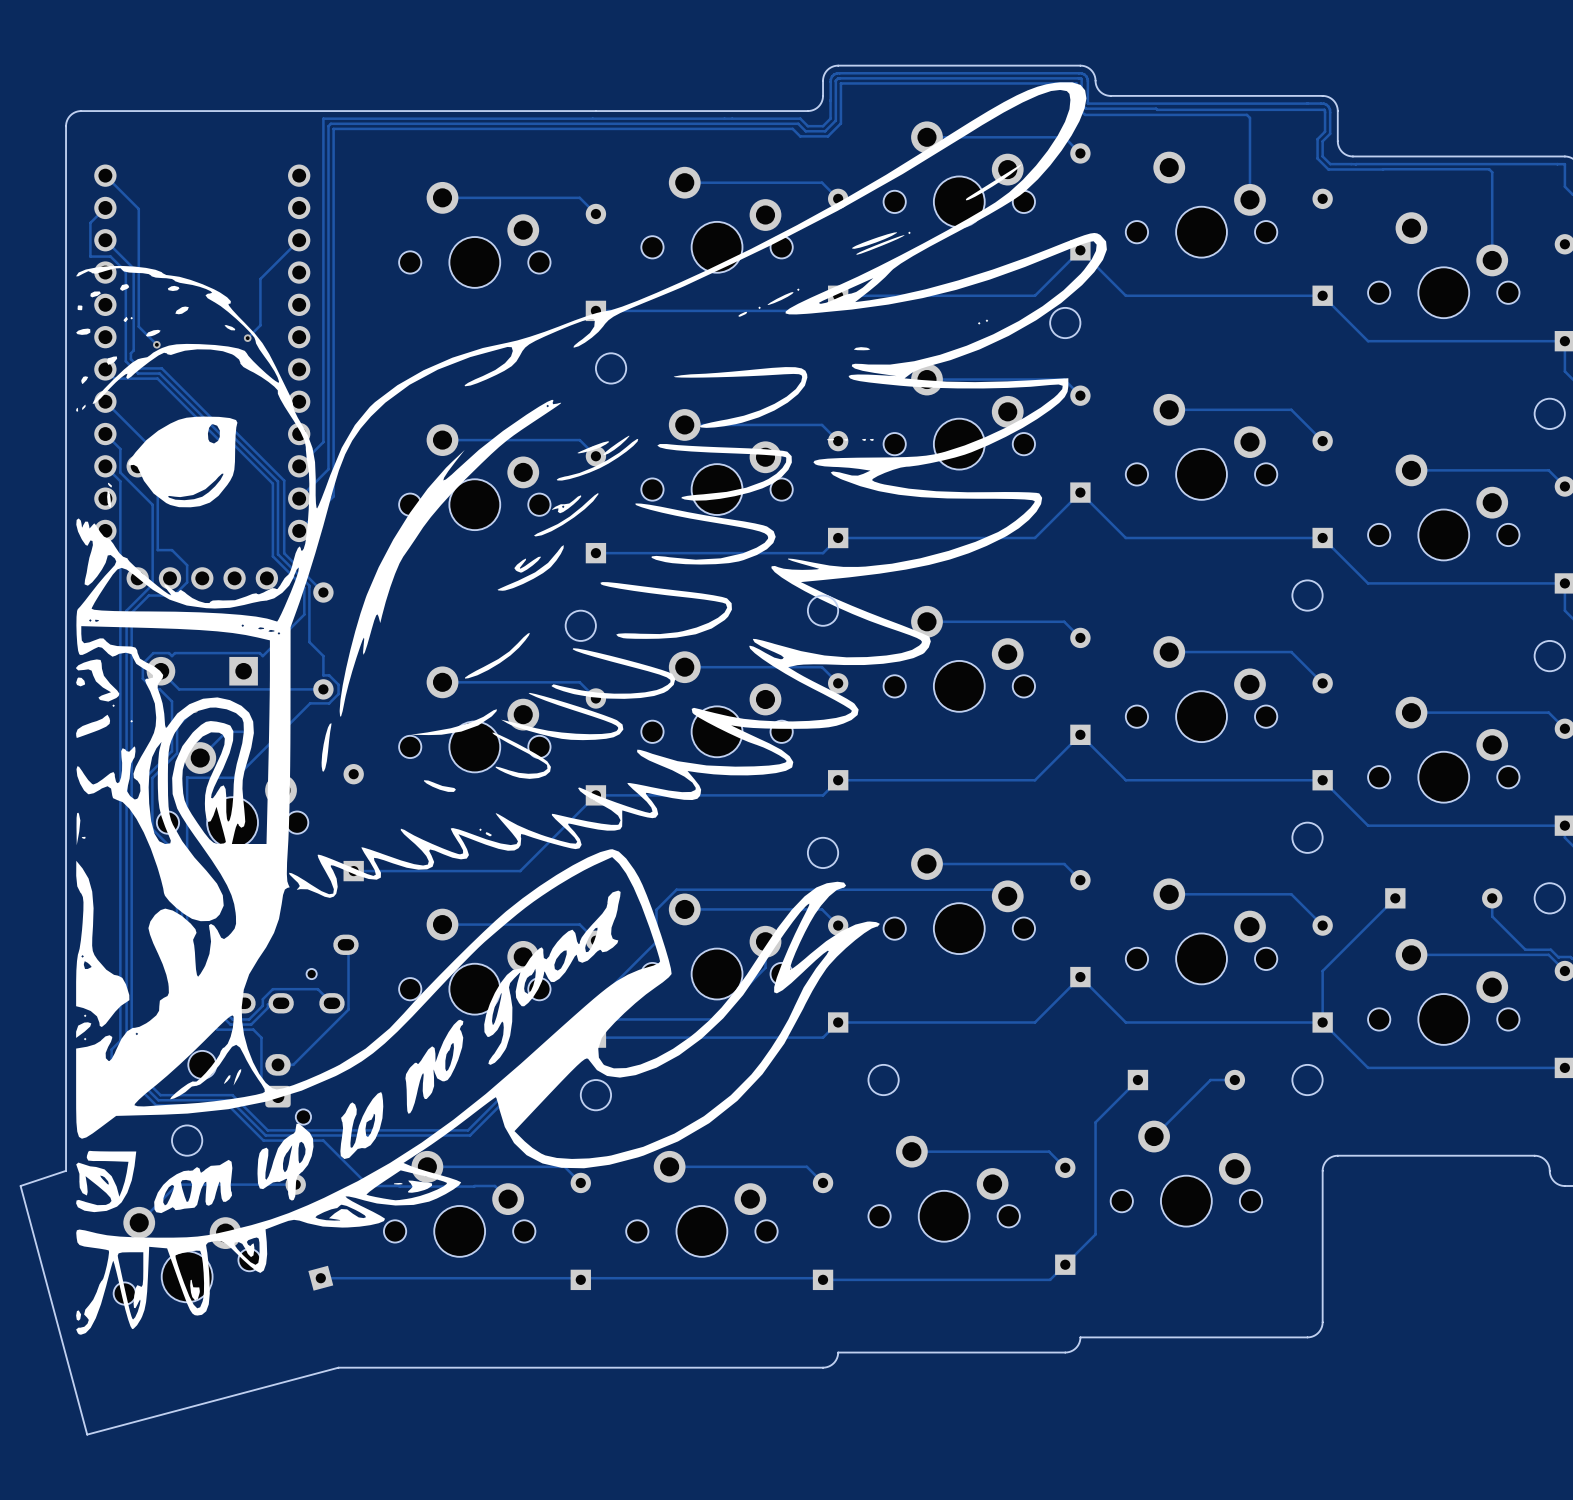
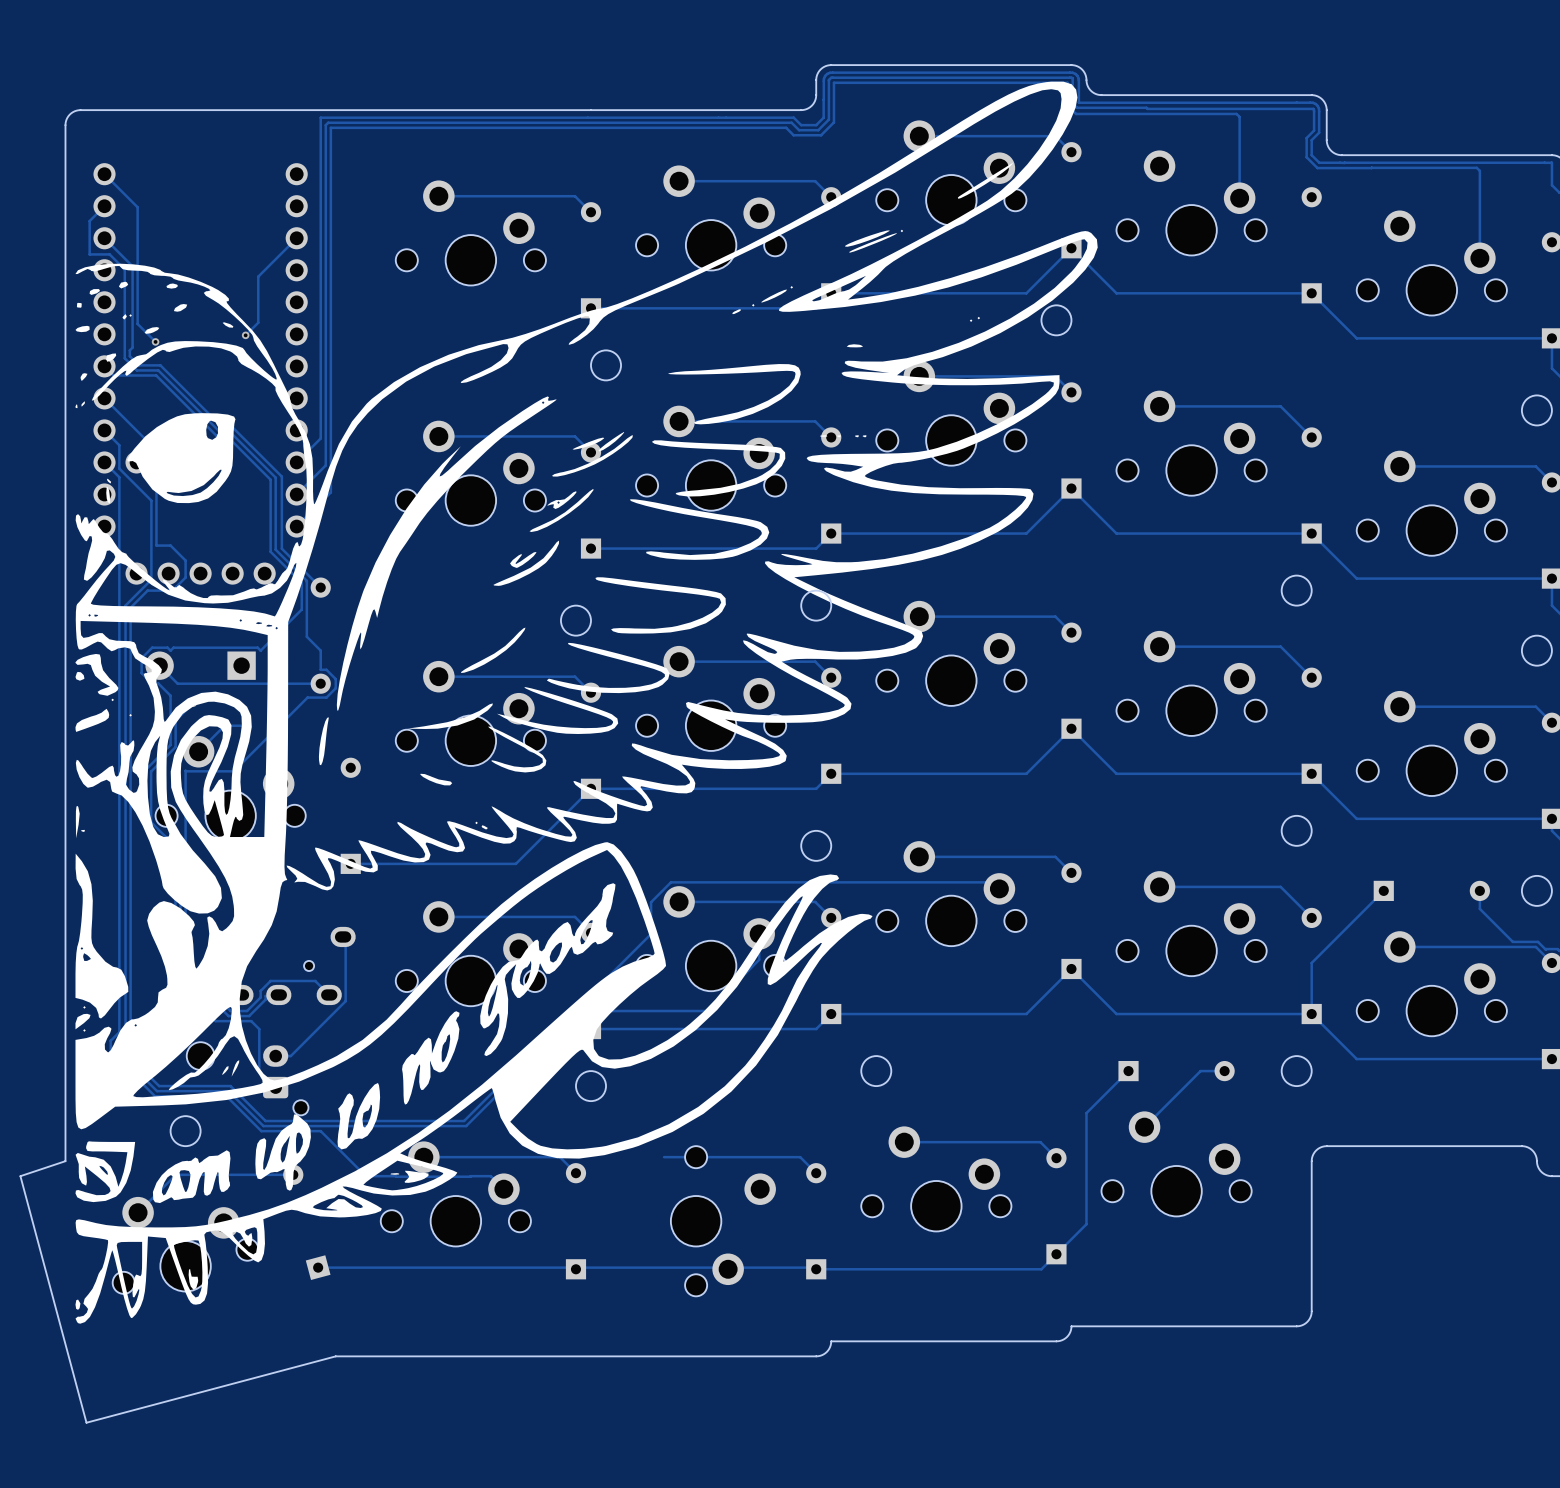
part rotation: 0° (701, 1203) -> 90° clockwise (723, 1221)

